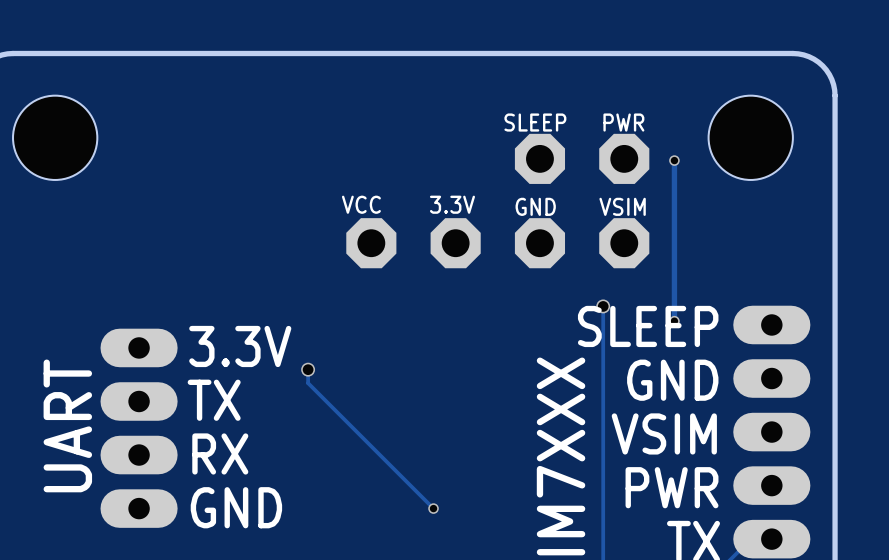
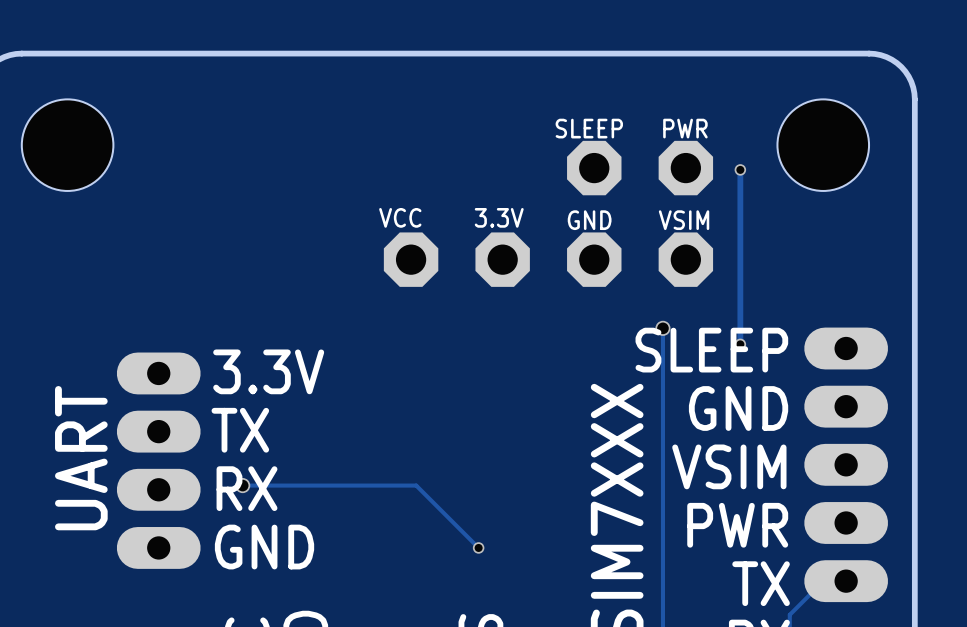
track: (308, 369) (308, 383) (376, 451) -> (242, 485) (416, 485)
via position: (308, 369) -> (242, 485)

